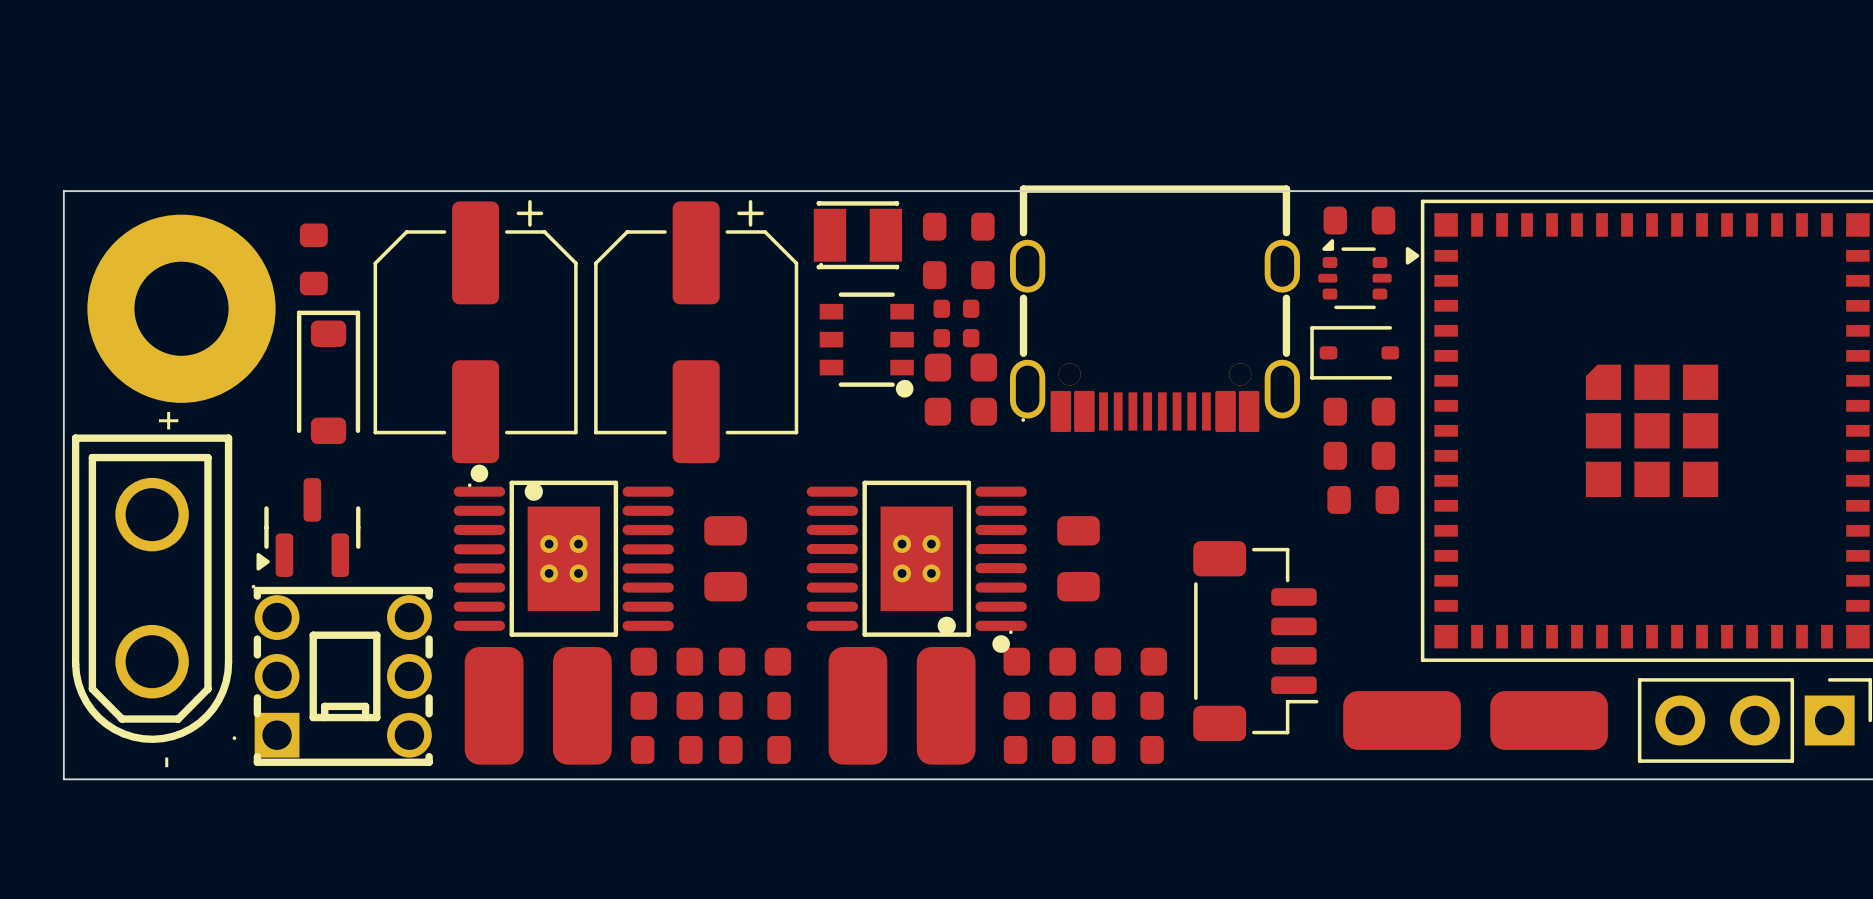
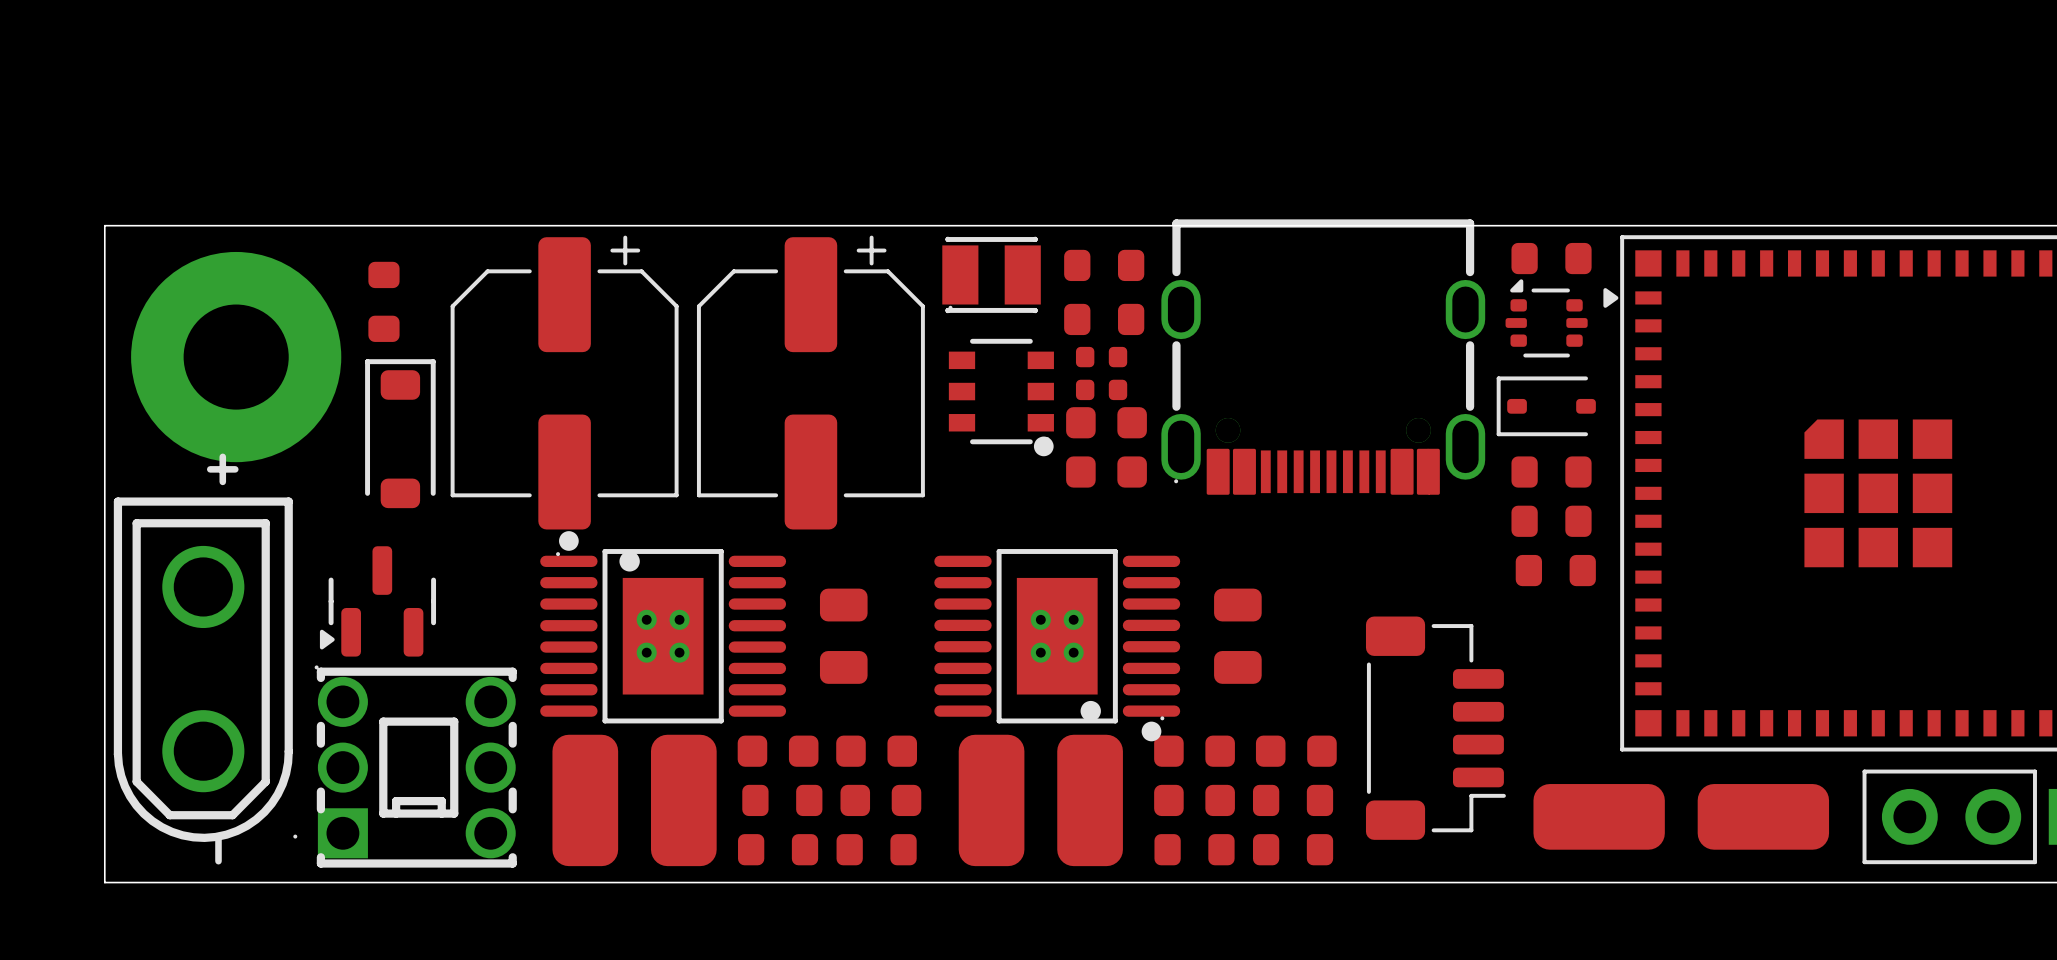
part footprint: [630, 691, 703, 720] -> [742, 784, 823, 817]
part footprint: [719, 691, 791, 720] -> [840, 784, 922, 817]

